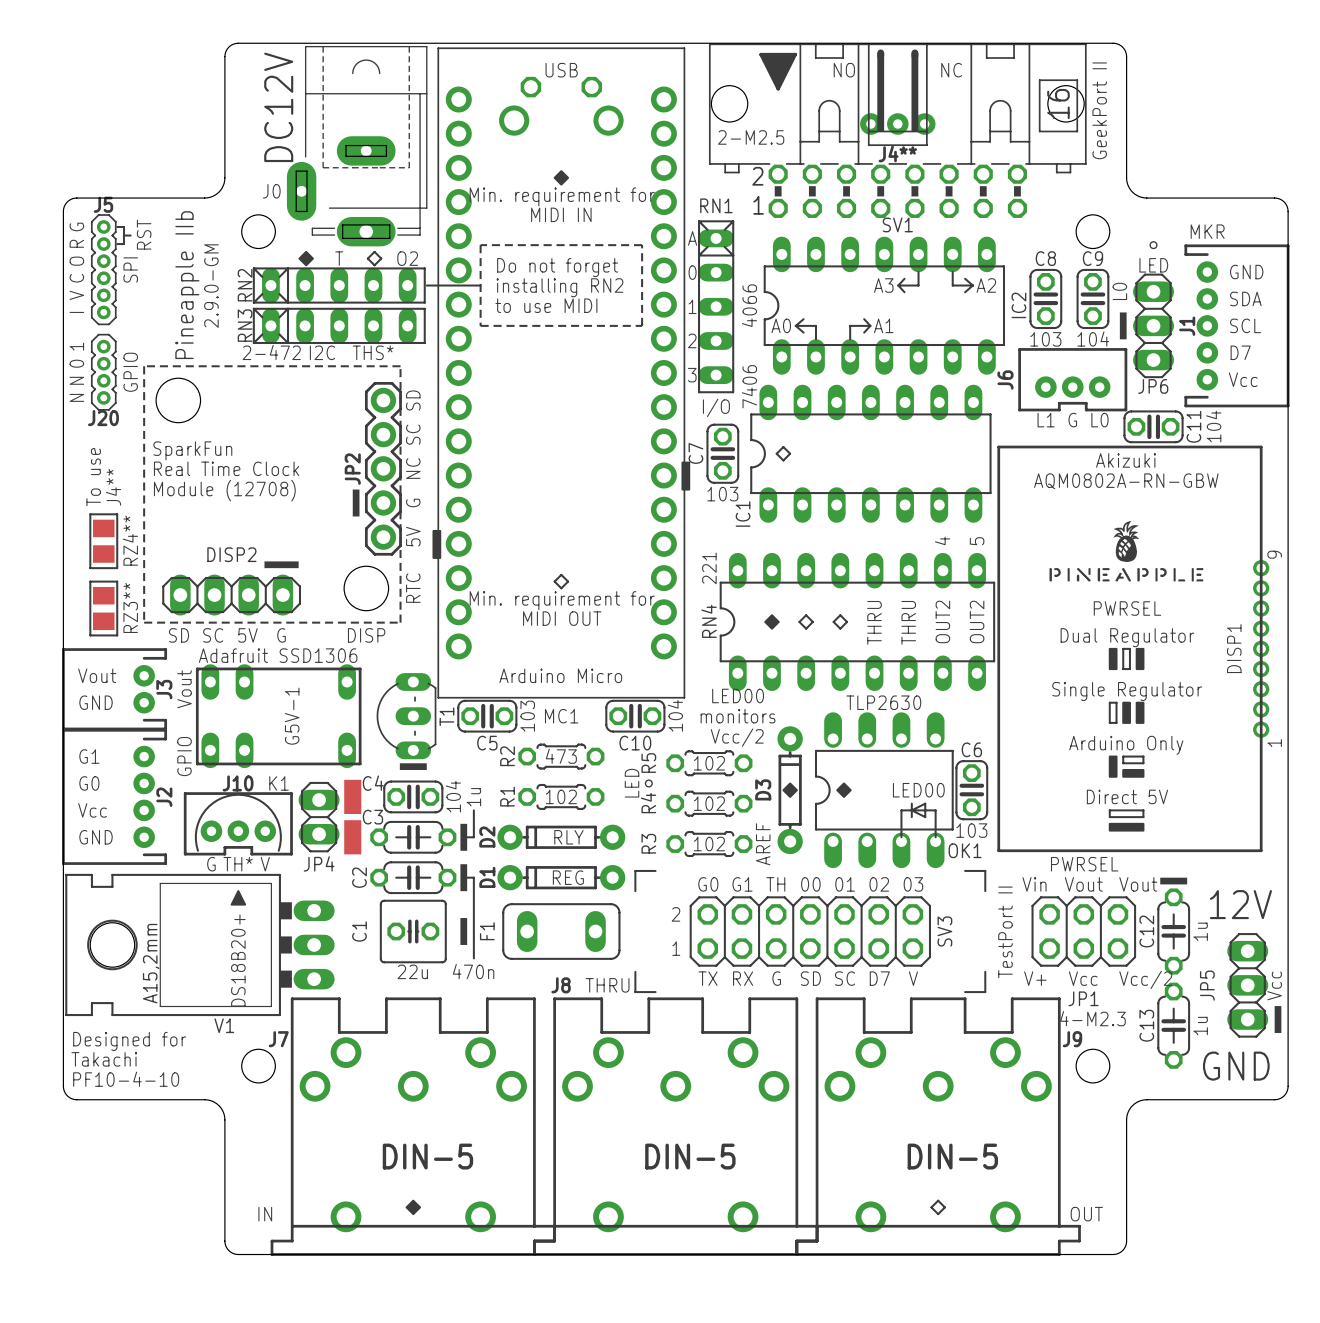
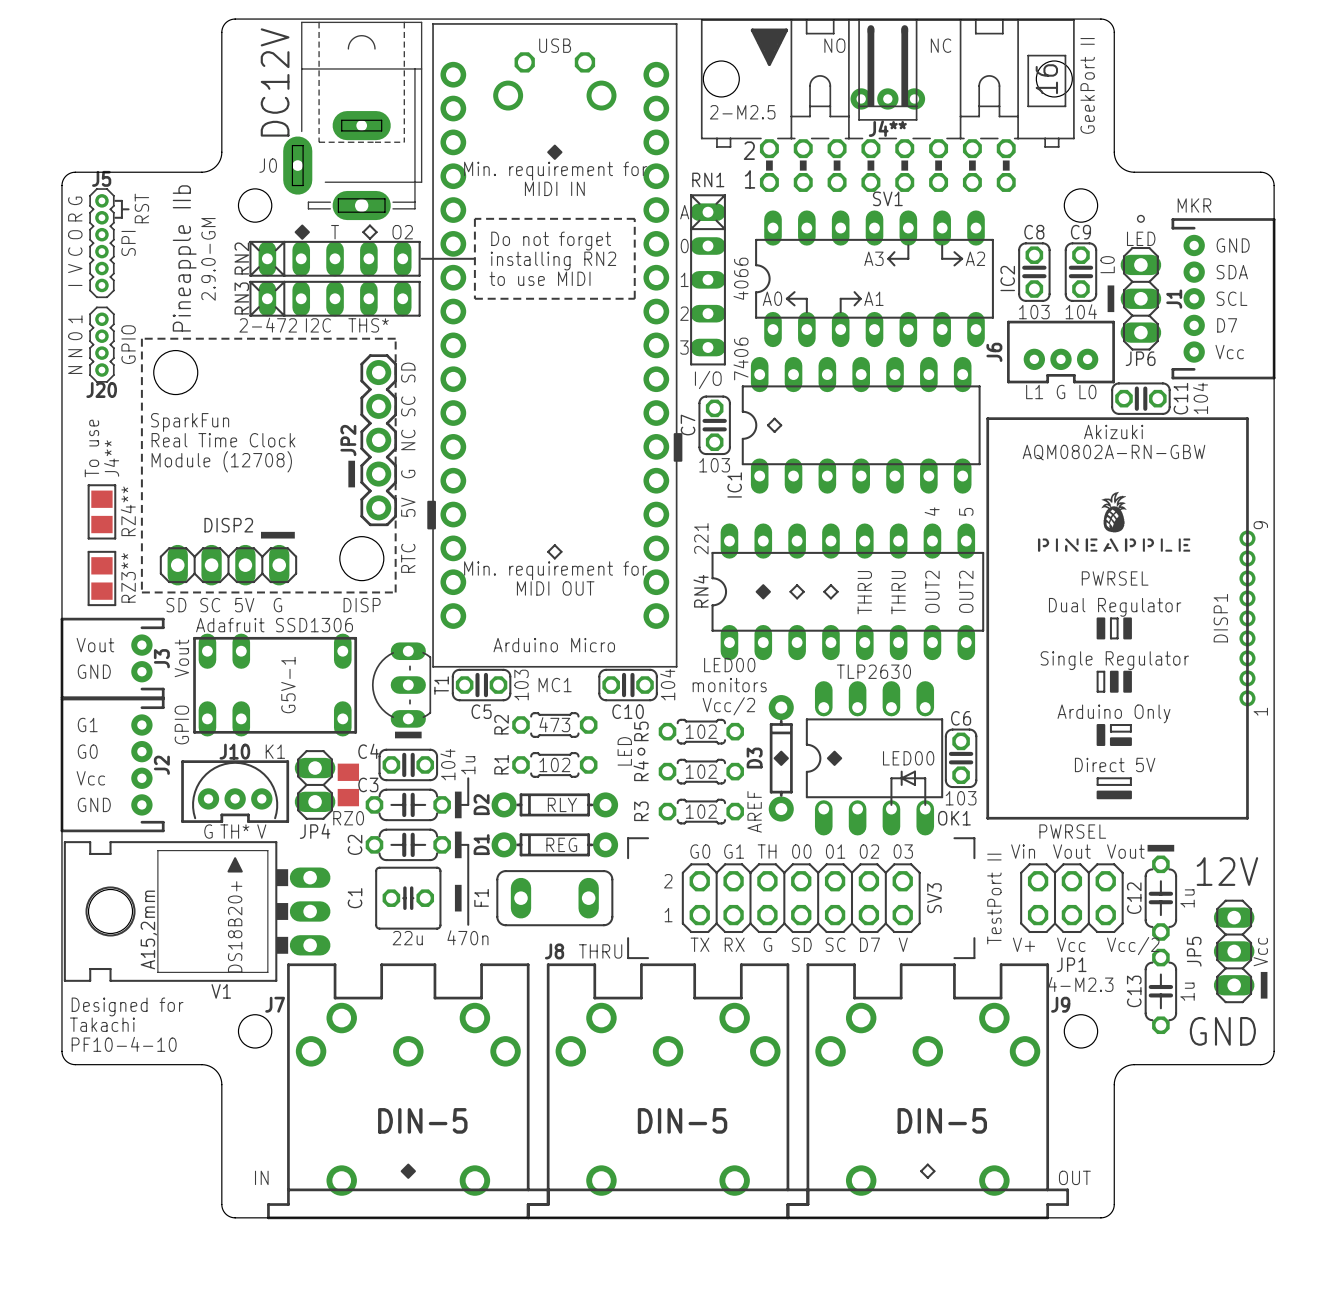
part: (352, 796) -> none
RZ0: none -> (348, 784)
part: (352, 837) -> none

